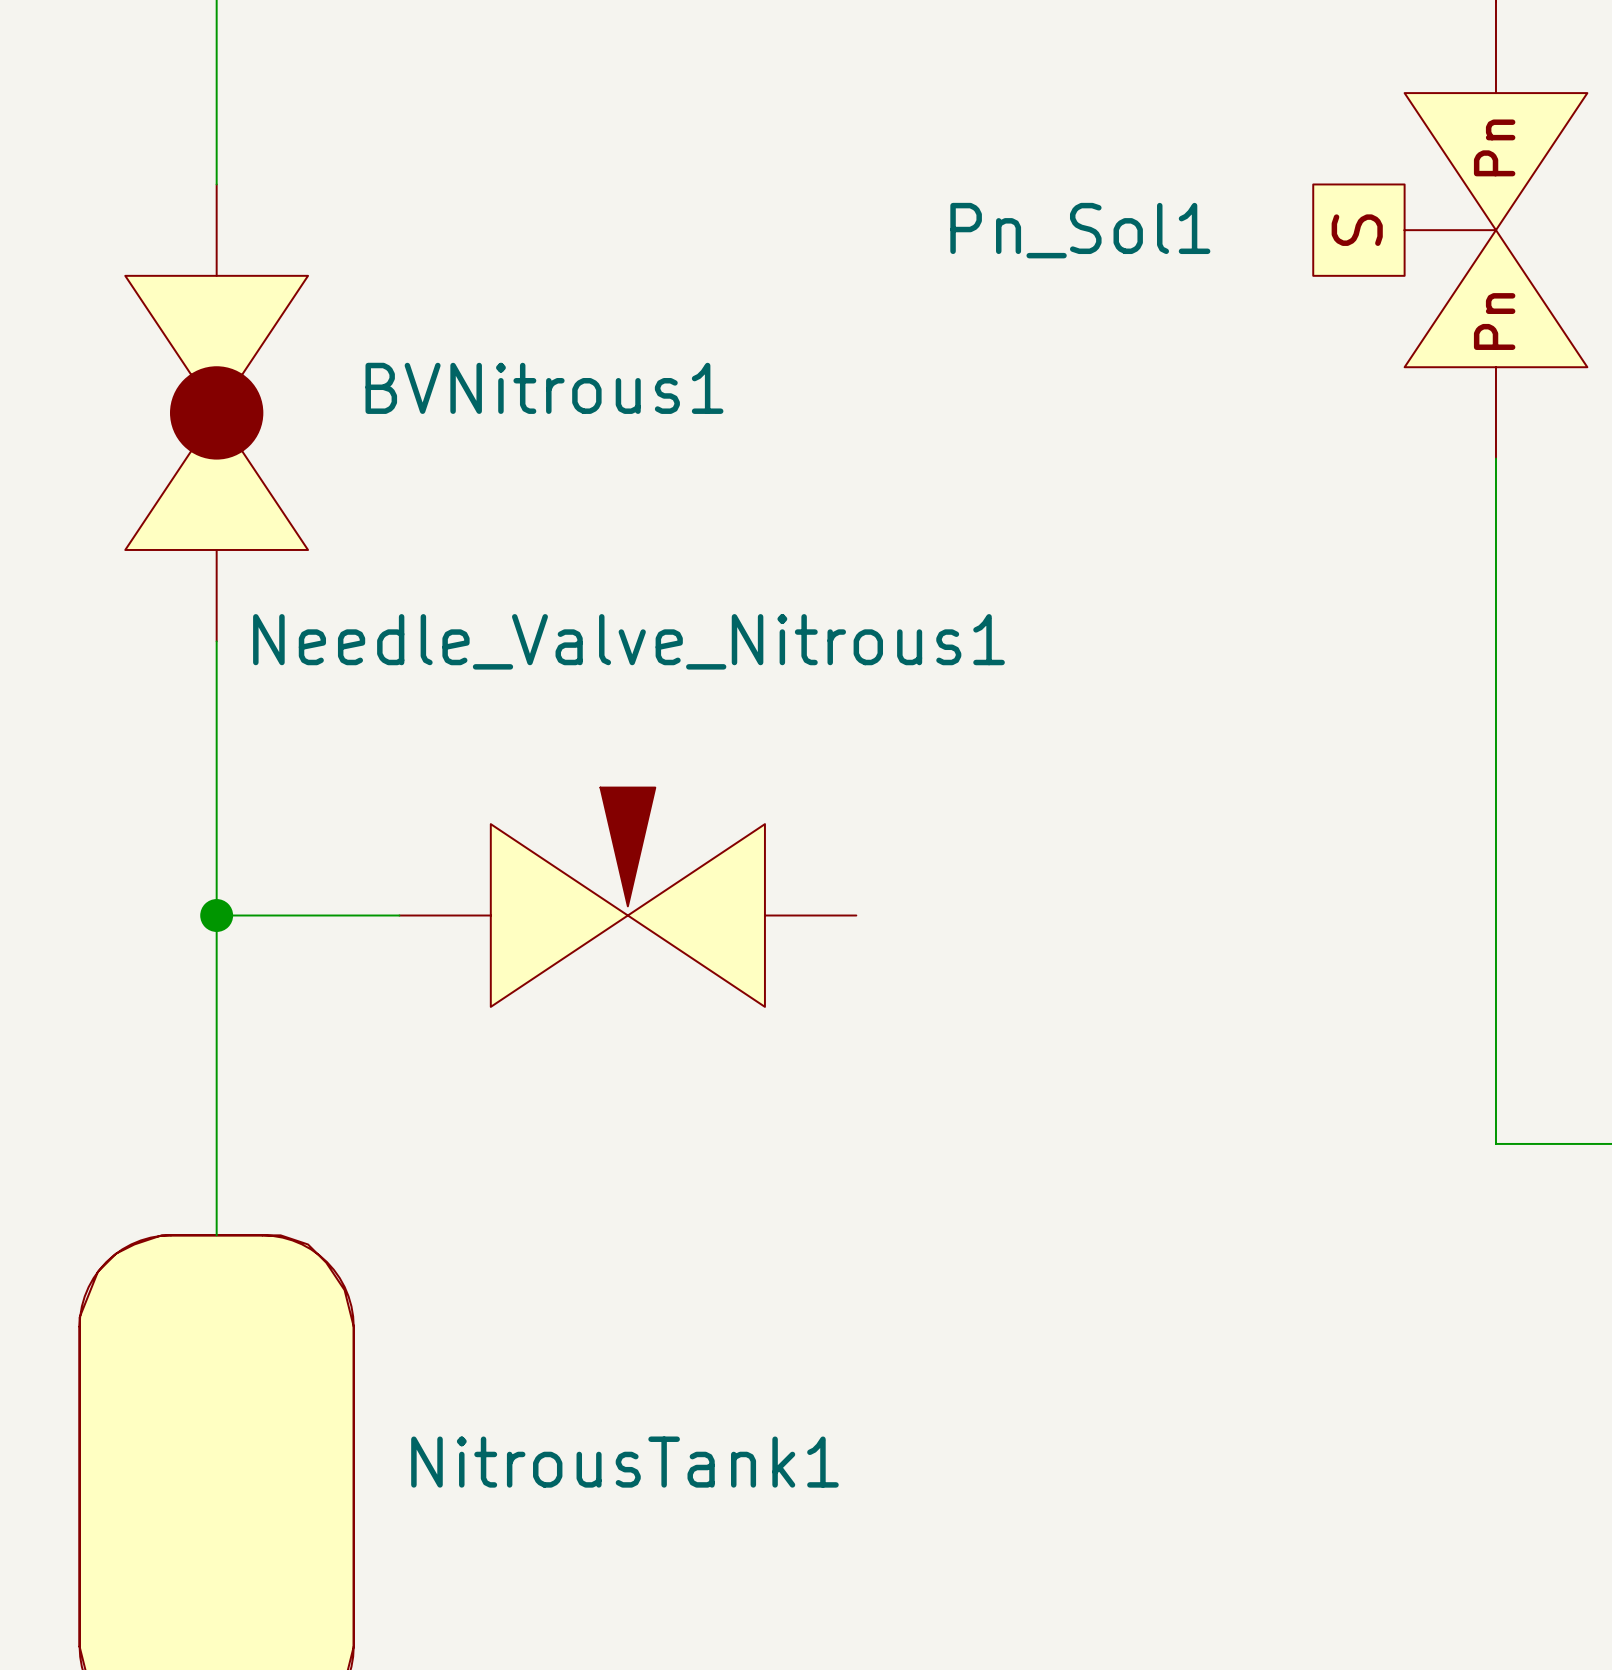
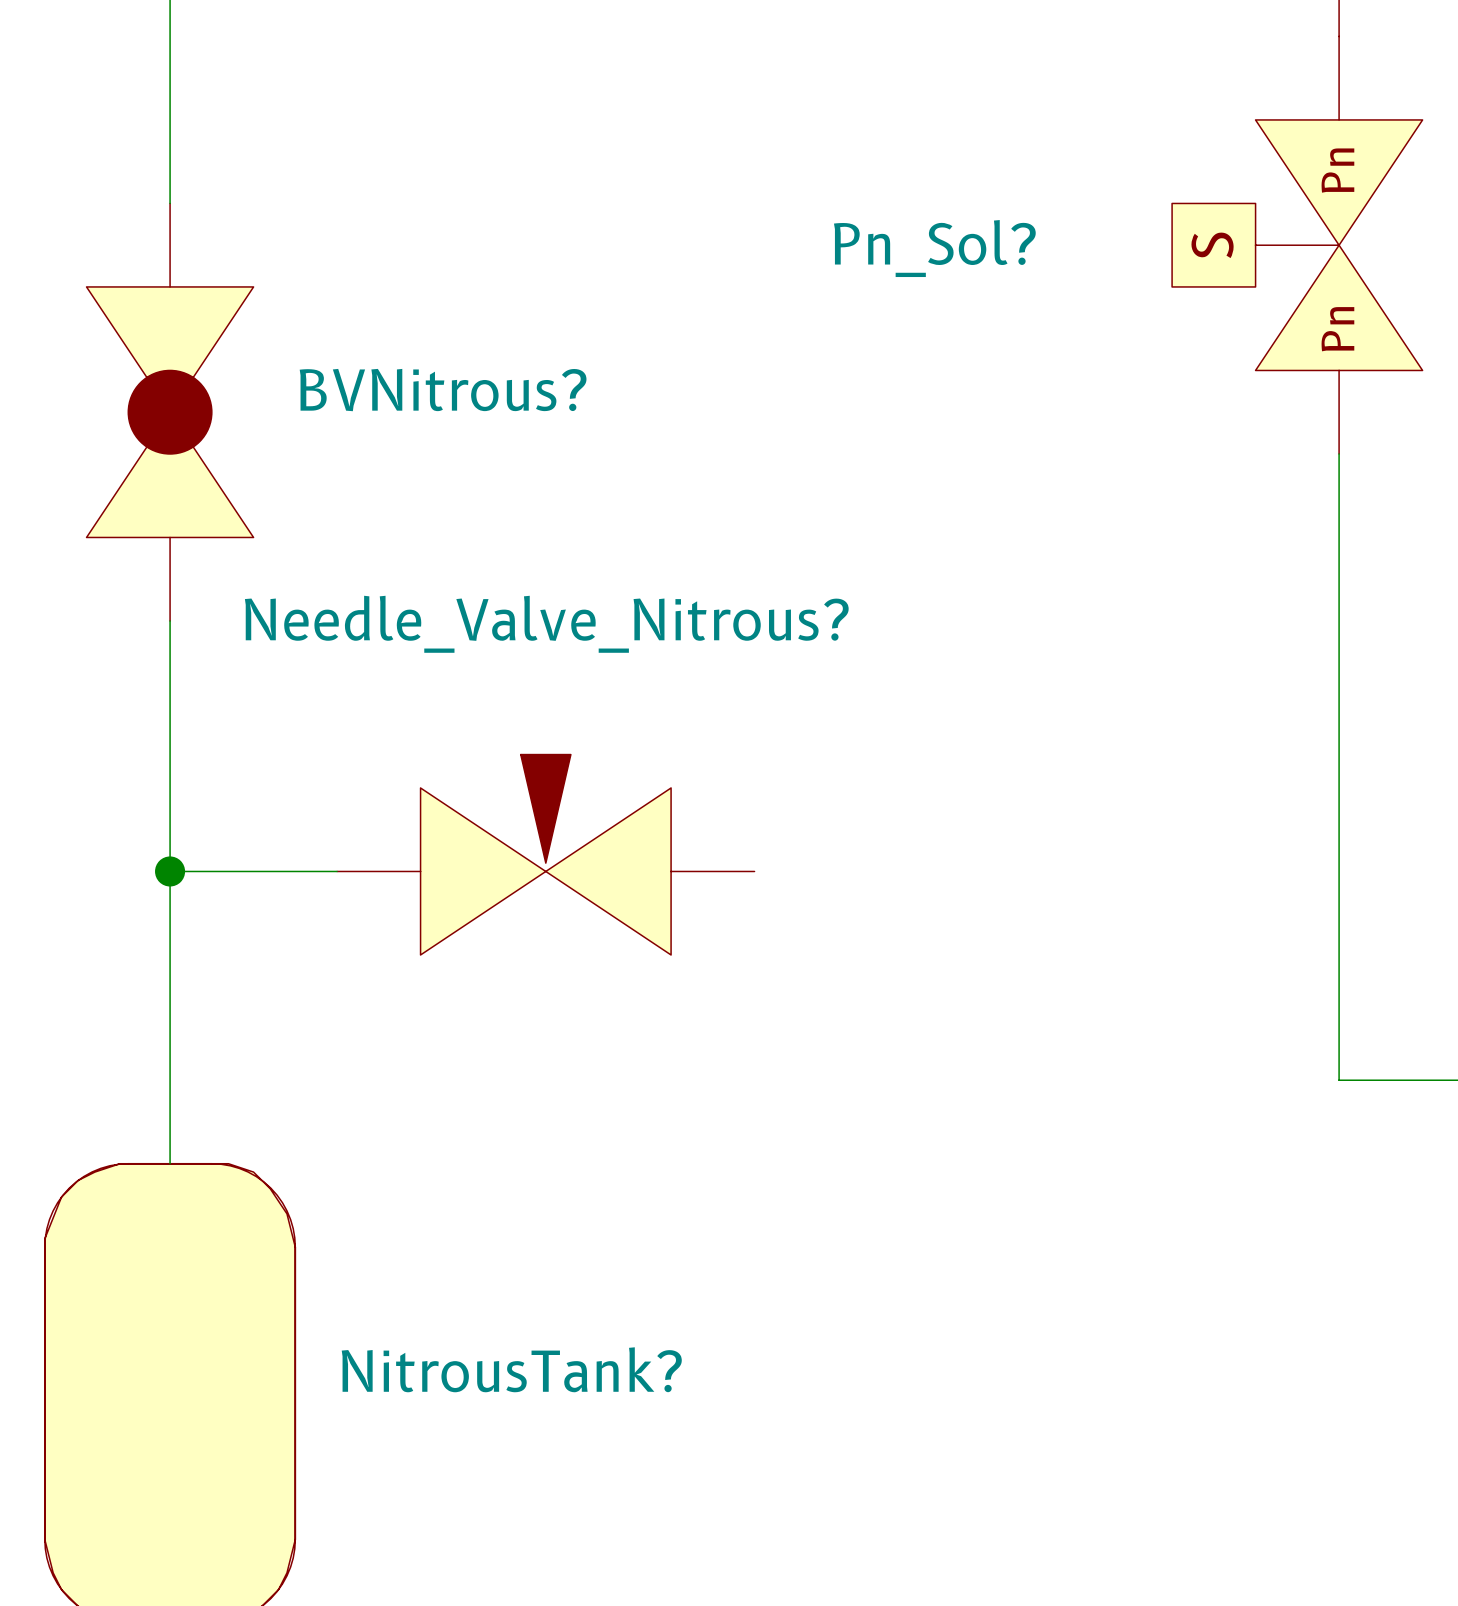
Pn_Sol1 name: Pn_Sol1 (1080, 230) -> Pn_Sol? (934, 248)
BVNitrous1 name: BVNitrous1 (544, 388) -> BVNitrous? (443, 390)
Needle_Valve_Nitrous1 name: Needle_Valve_Nitrous1 (628, 641) -> Needle_Valve_Nitrous? (546, 624)
NitrousTank1 name: NitrousTank1 (624, 1462) -> NitrousTank? (511, 1369)

